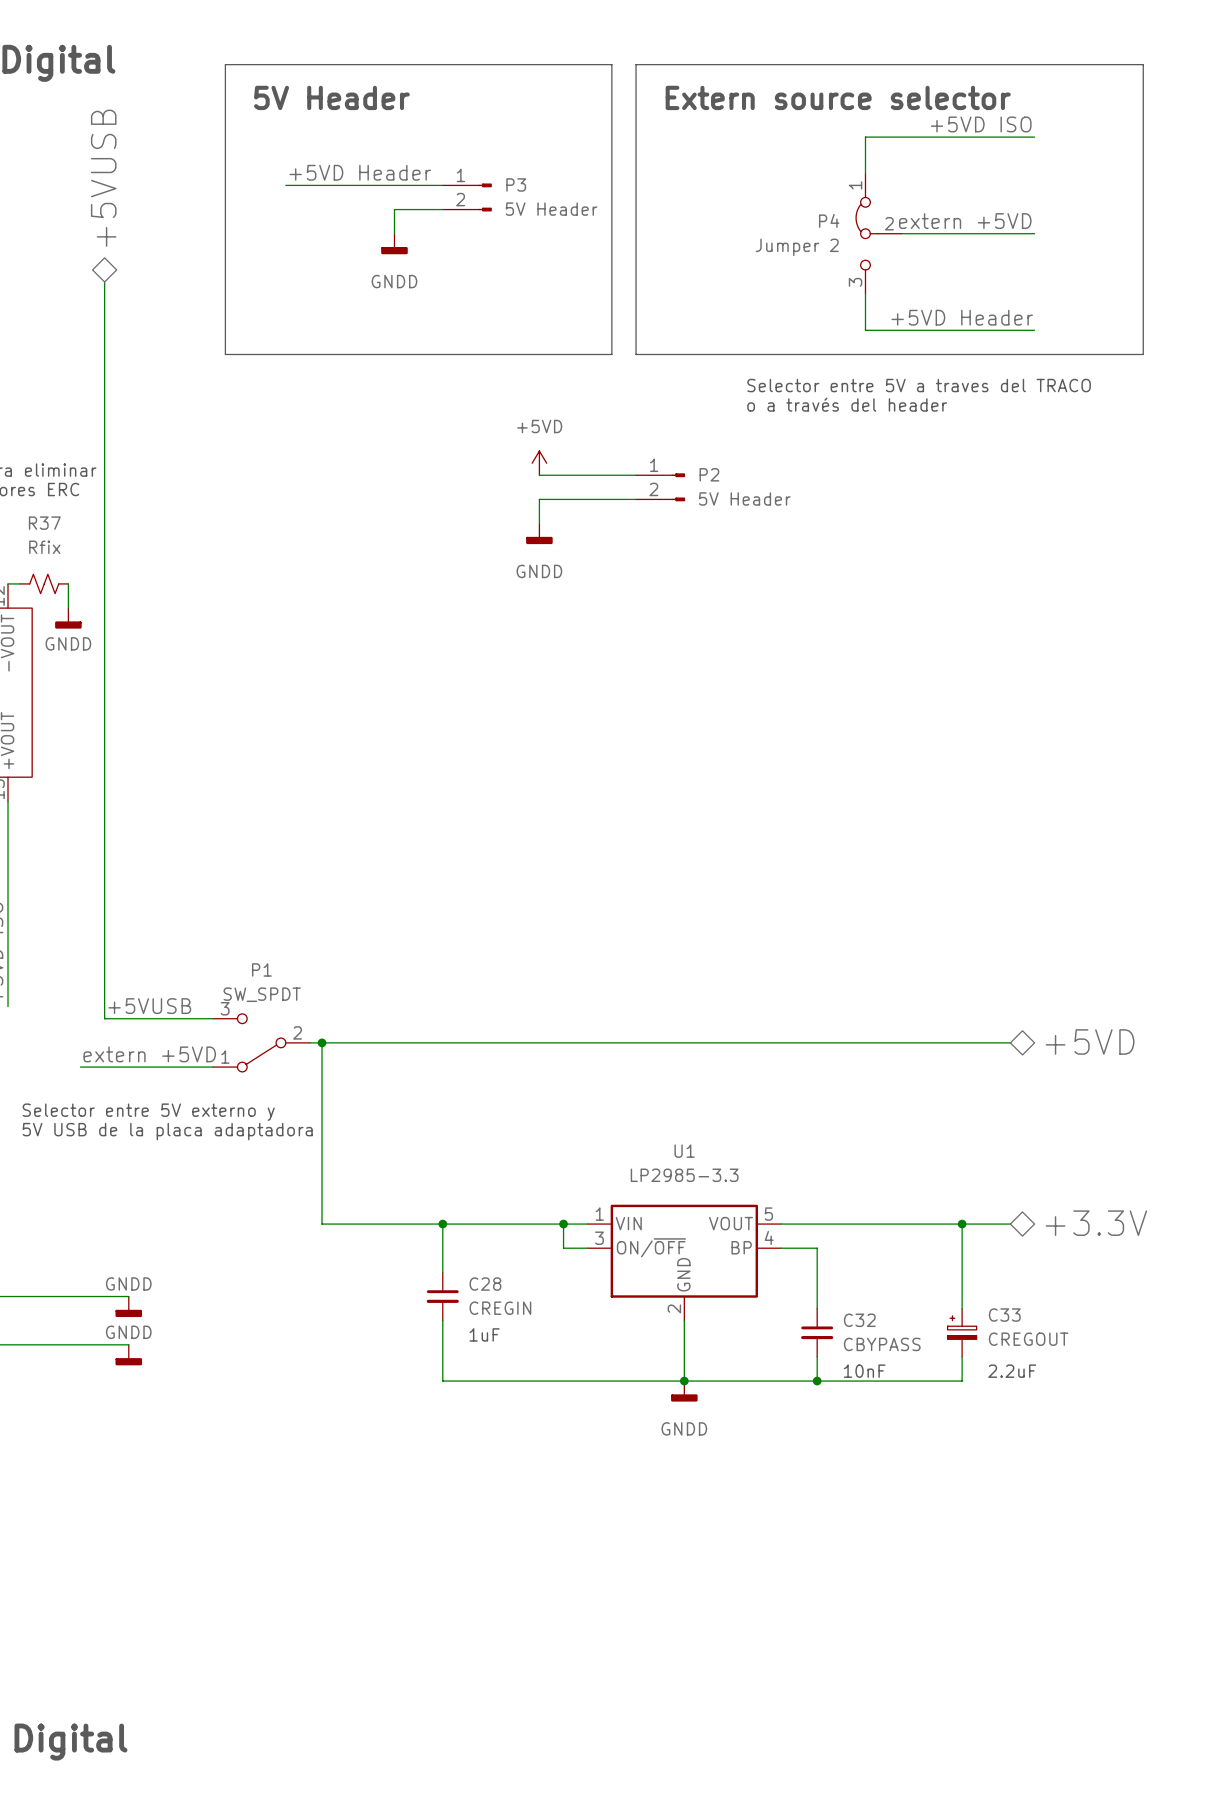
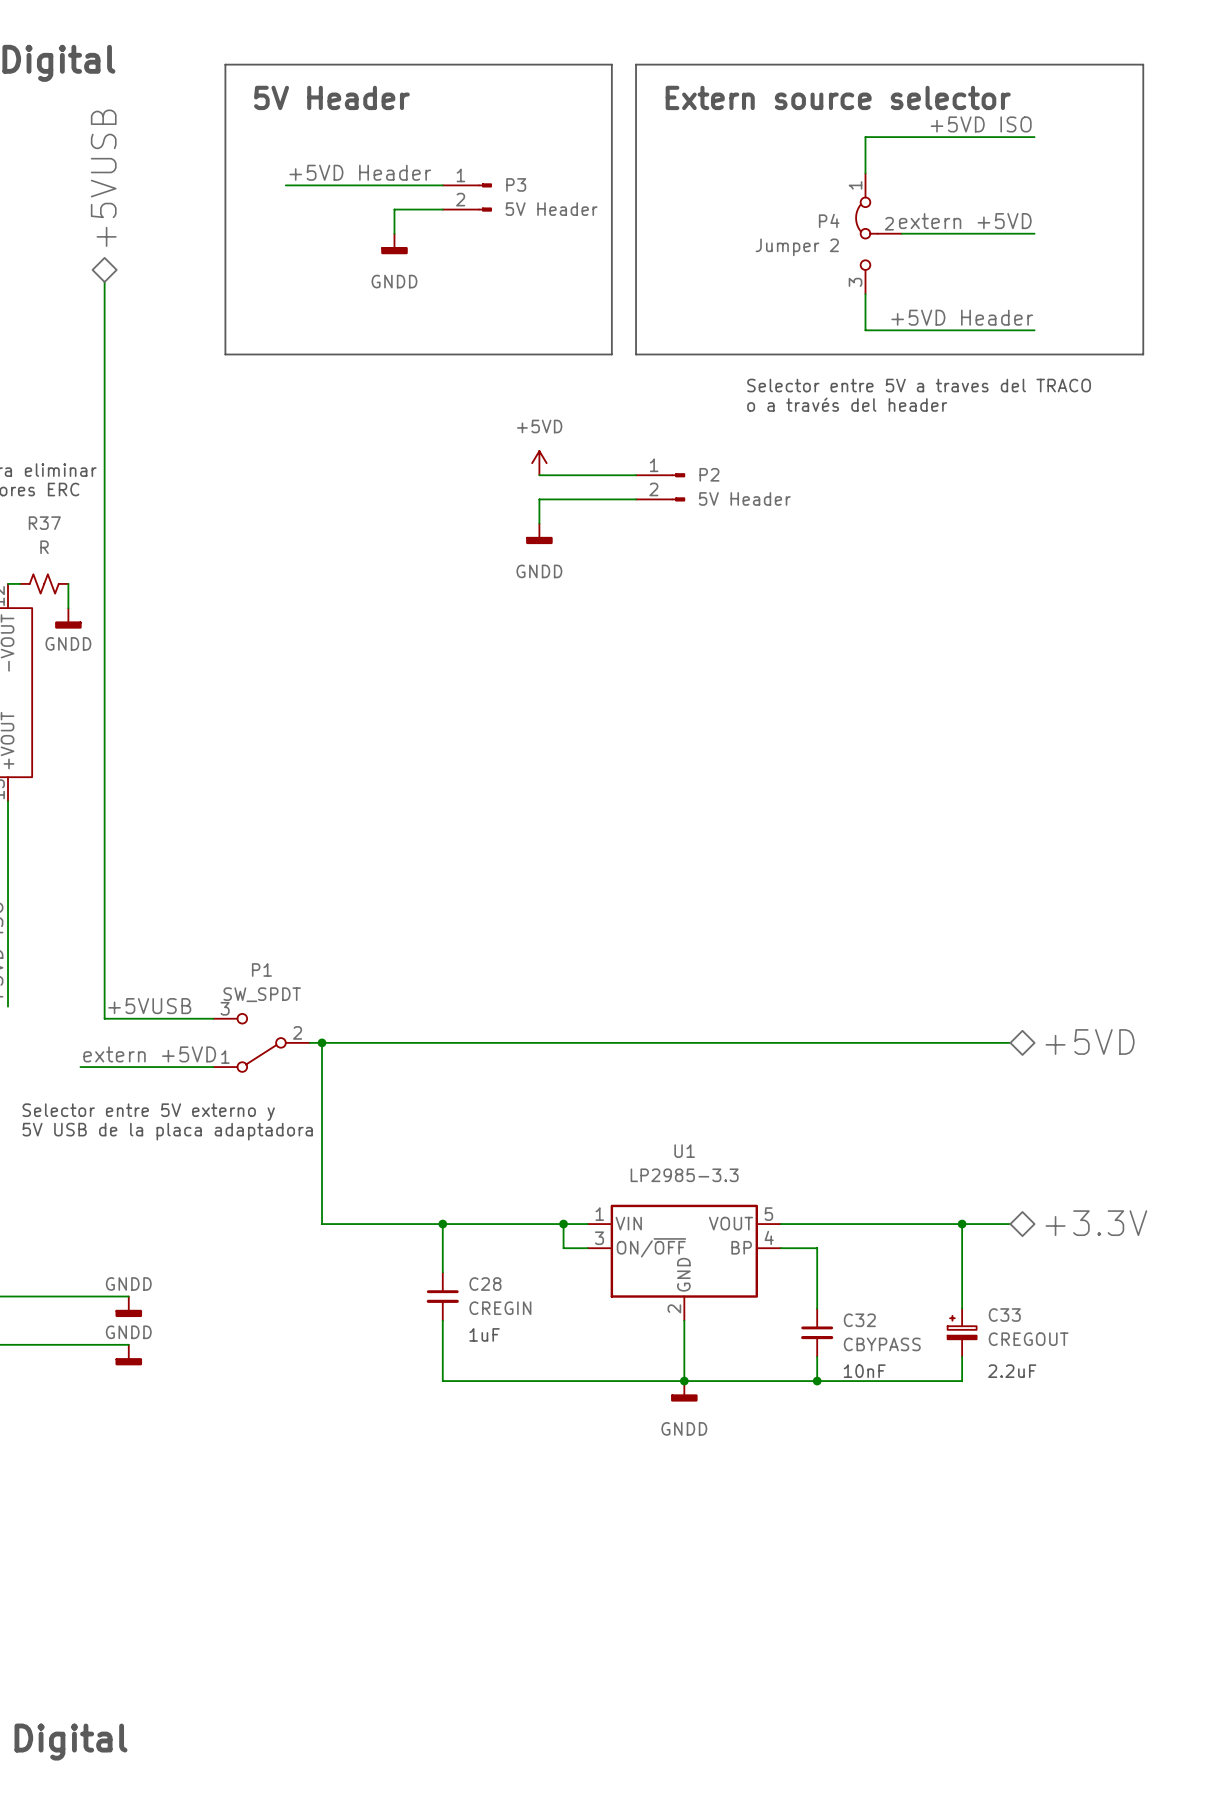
R37 value: Rfix (44, 547) -> R (44, 547)

